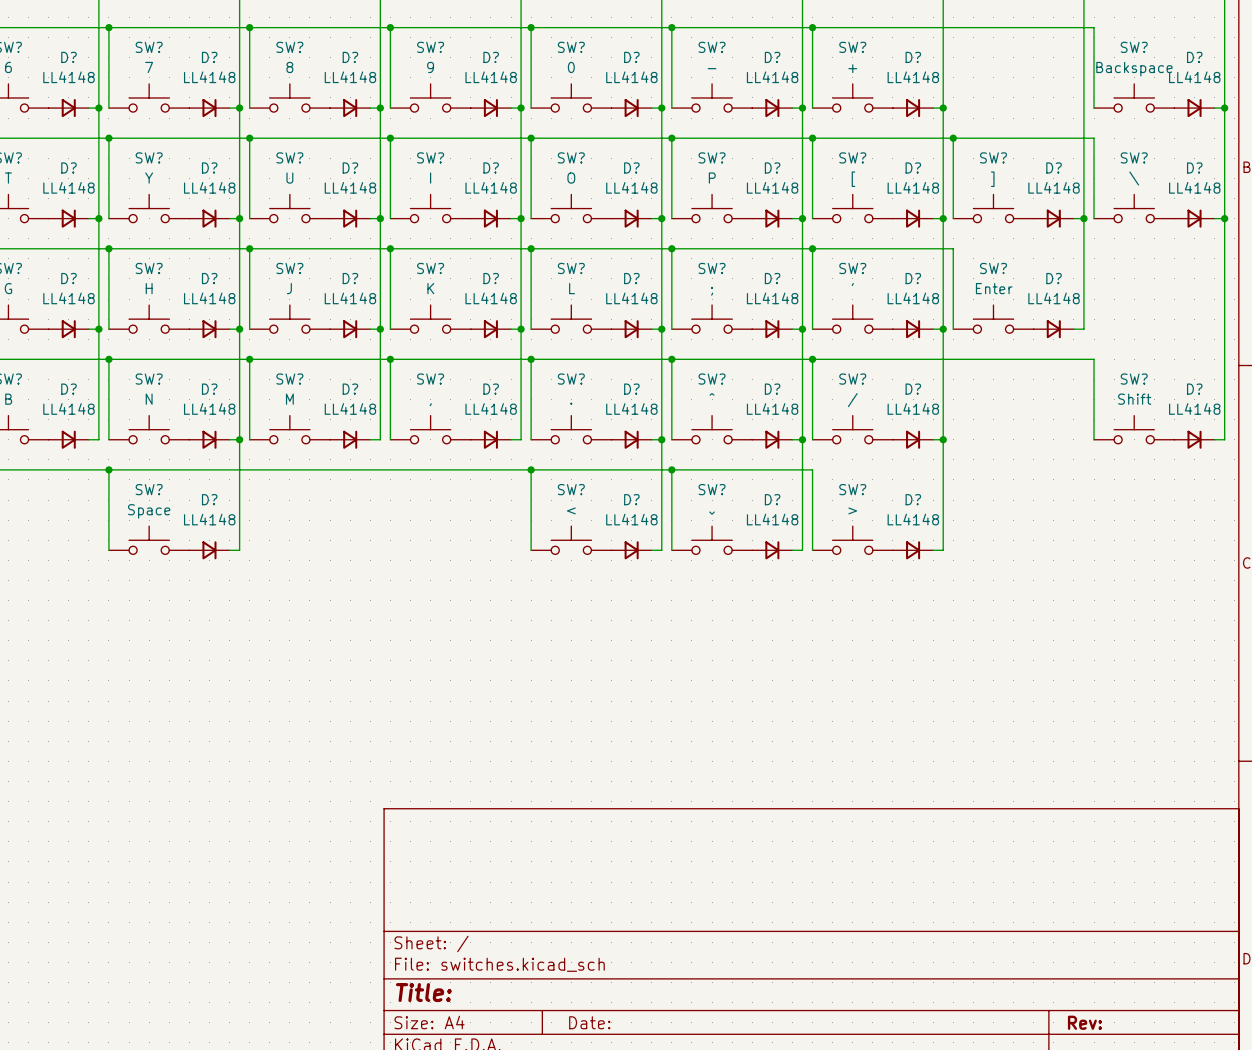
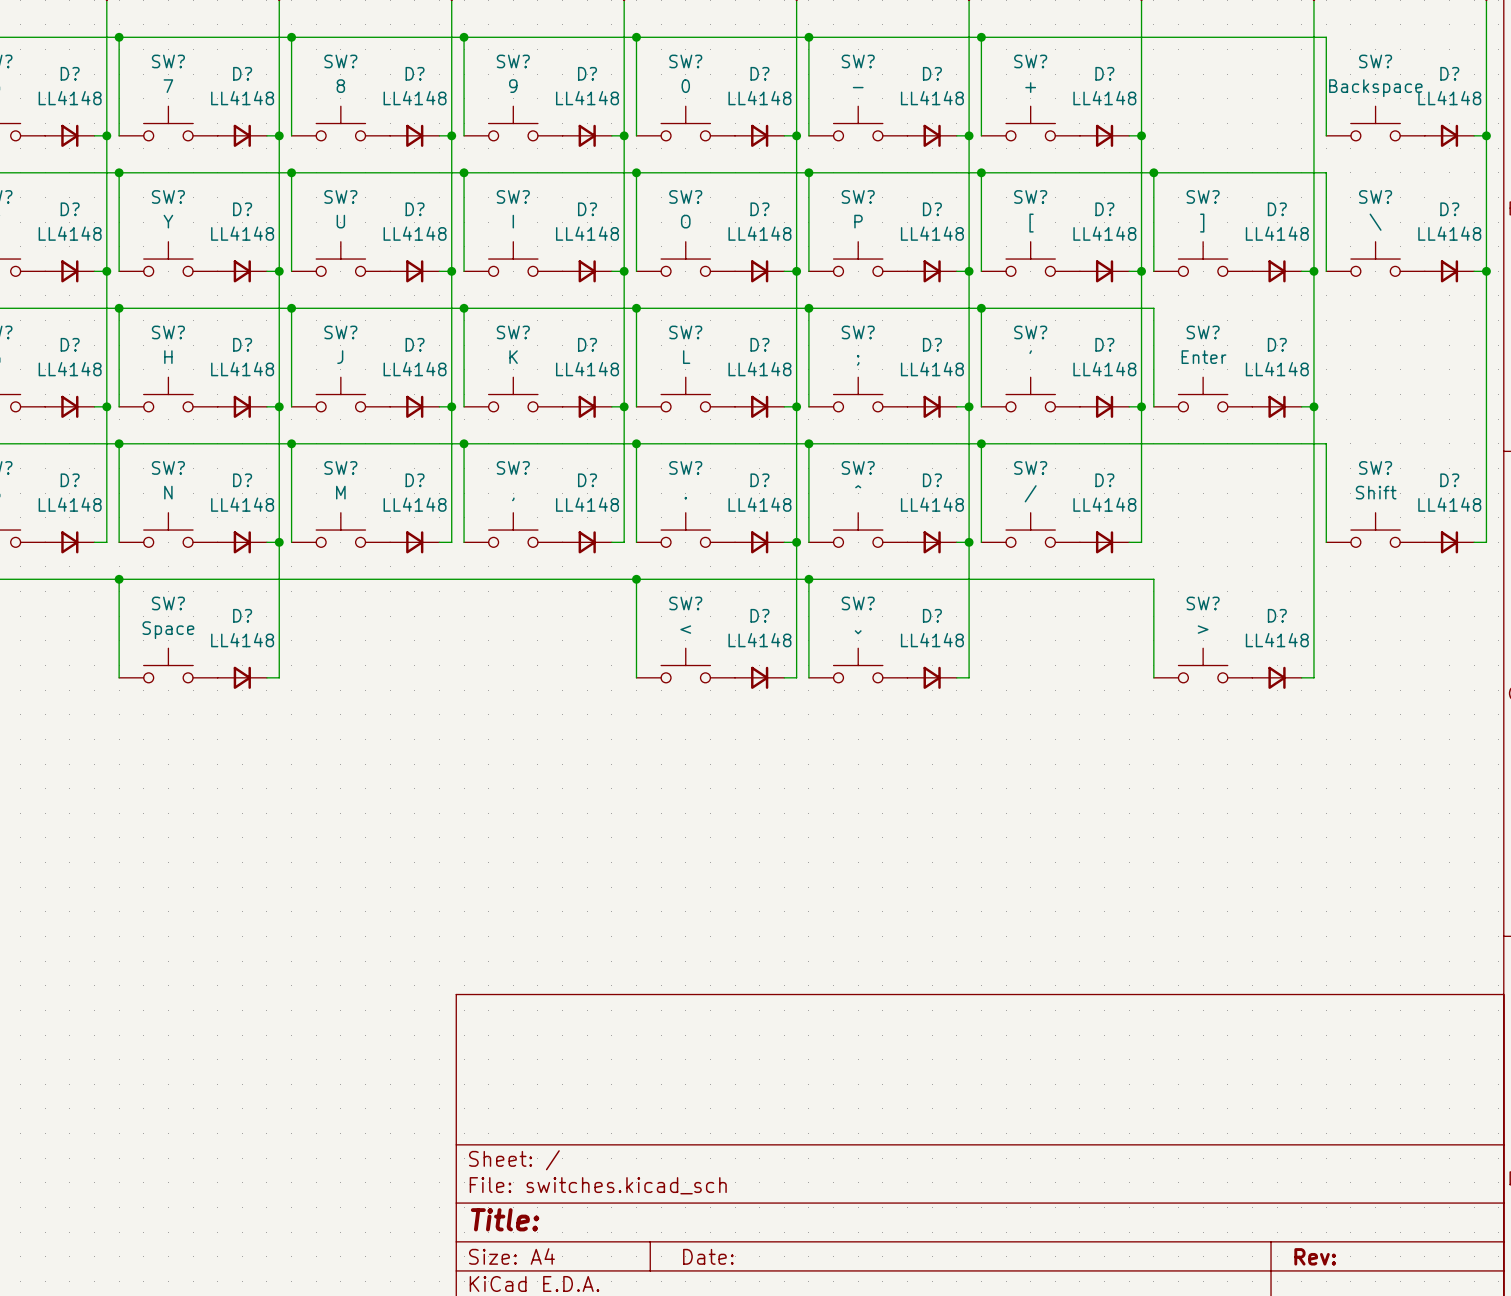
wire: none -> (1313, 406) (1313, 677) (1301, 677)
junction: none -> (1313, 406)
wire: (943, 439) (943, 550) (933, 550) -> none
junction: (943, 439) -> none
wire: (812, 469) (812, 550) -> (981, 579) (1153, 579) (1153, 677)
SW? position: (852, 540) -> (1203, 665)
D? position: (913, 550) -> (1277, 677)

